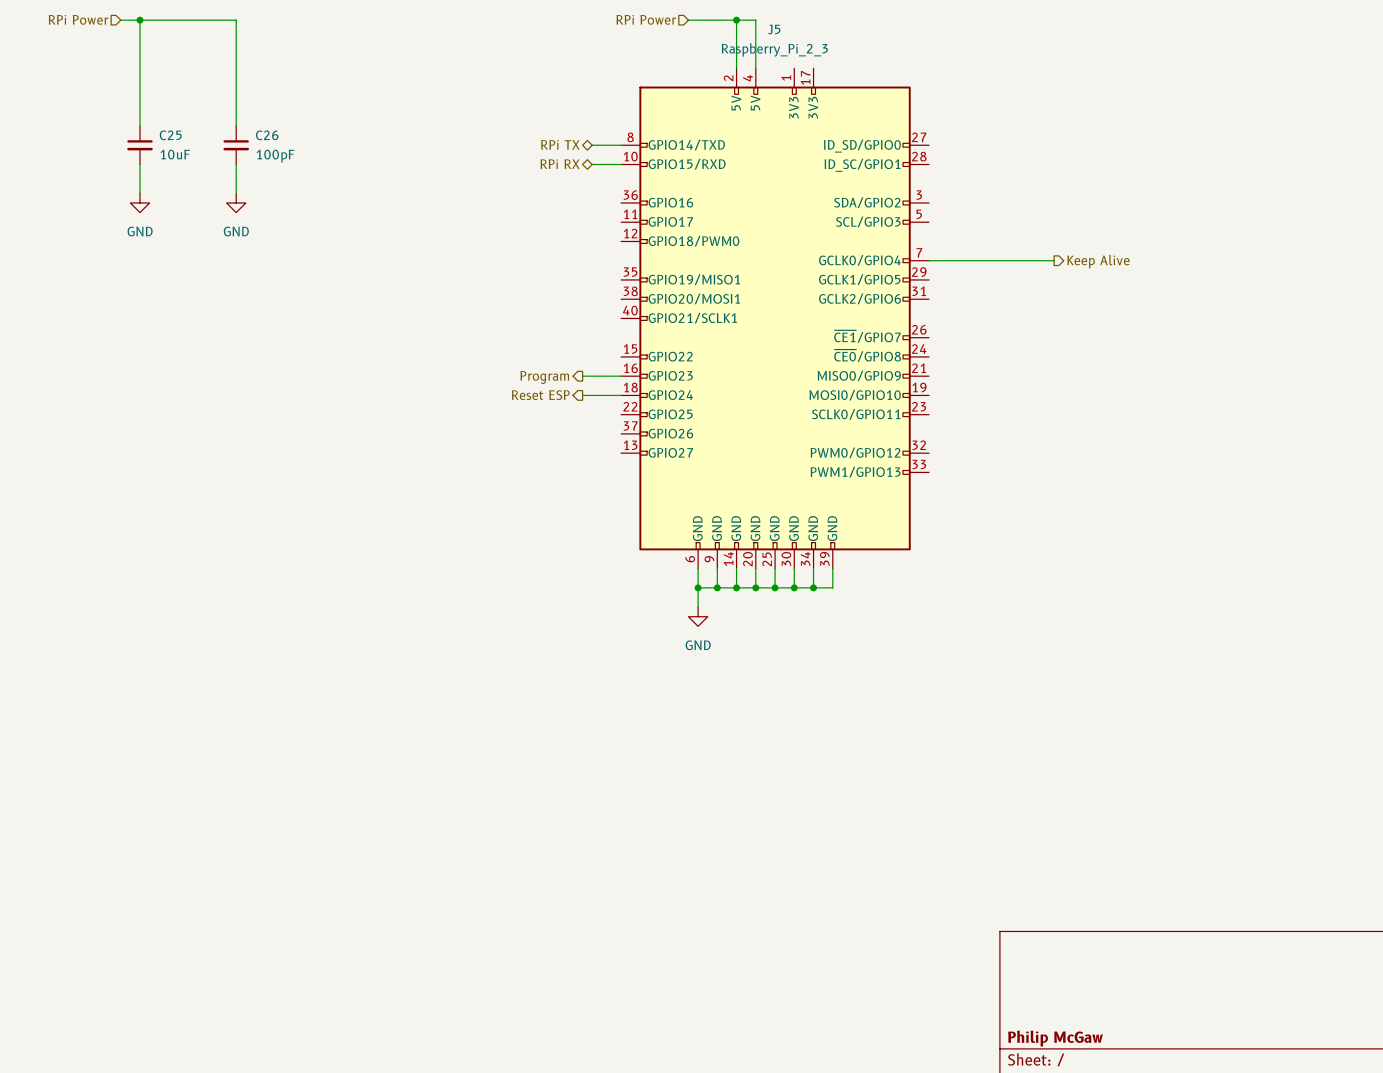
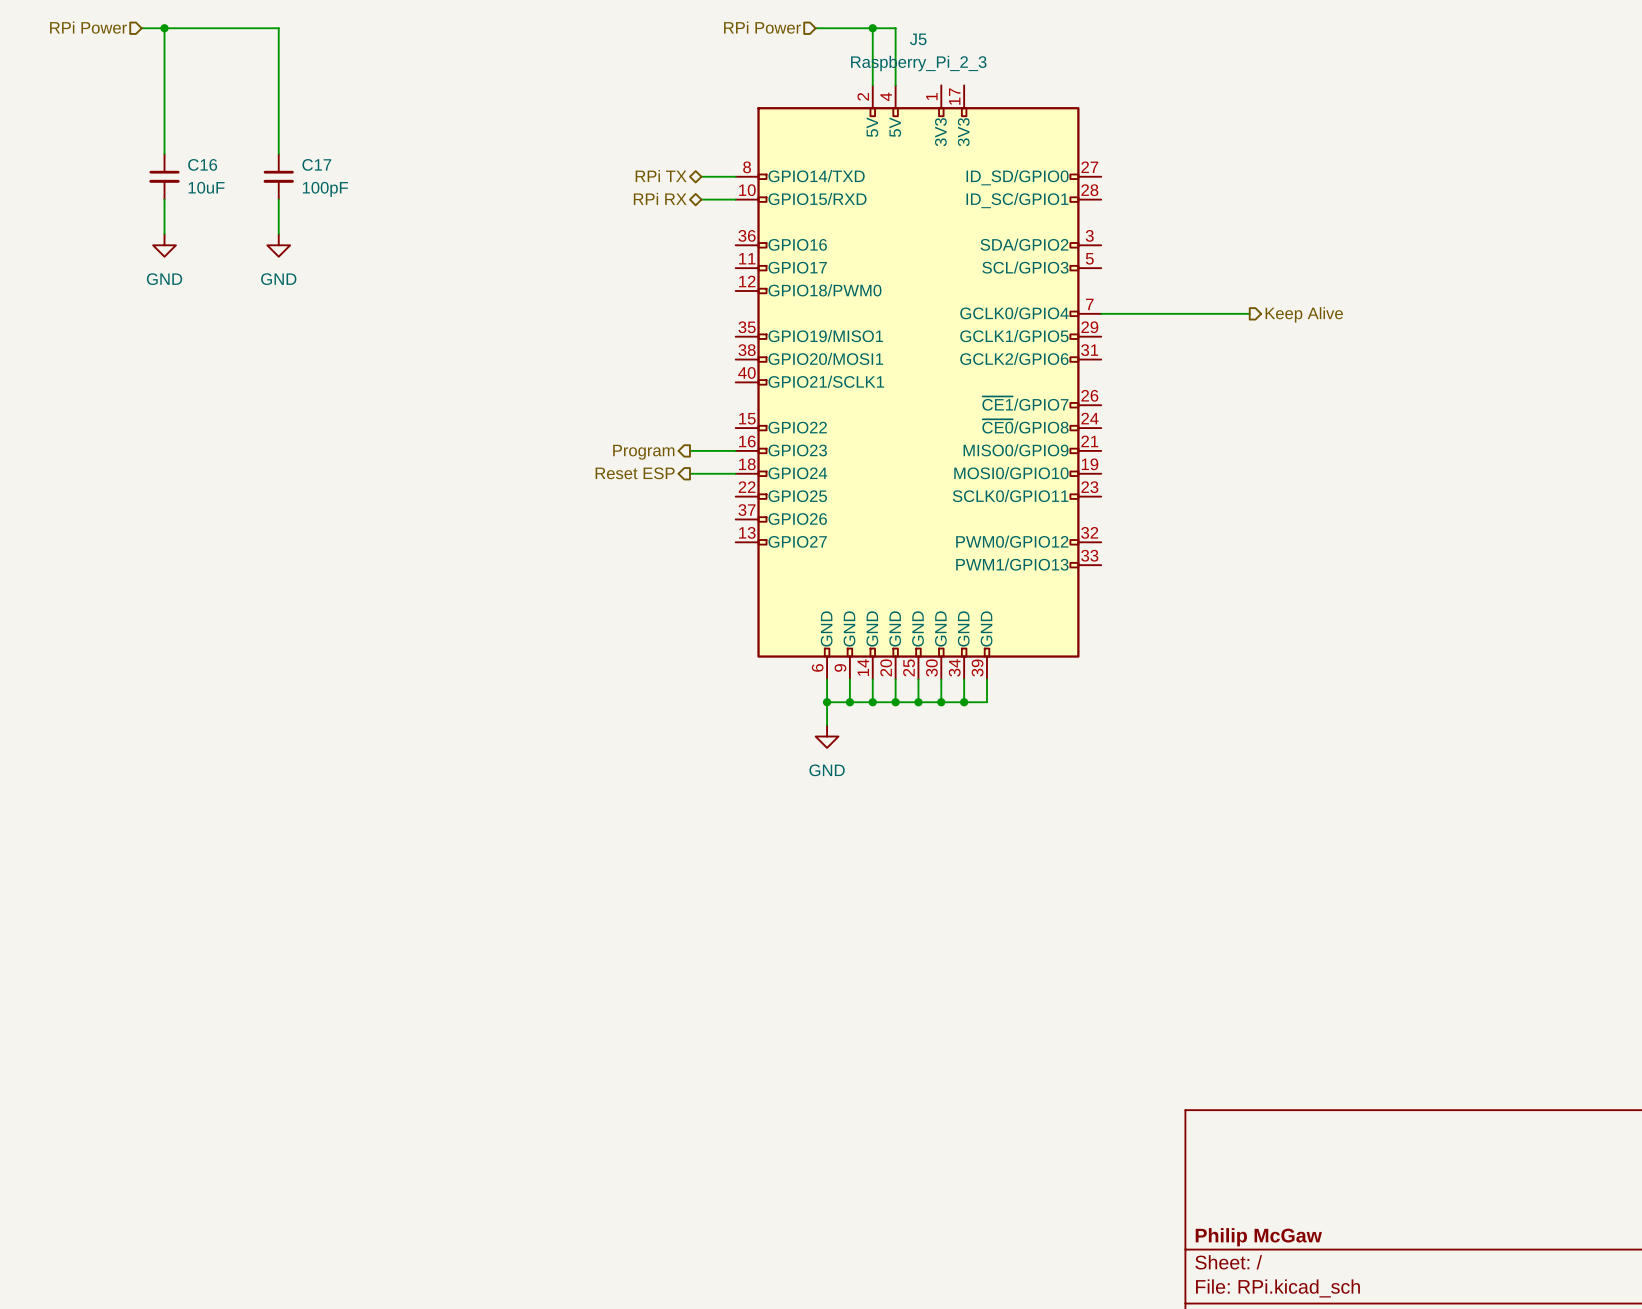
C25 name: C25 (170, 135) -> C16 (202, 164)
C26 name: C26 (267, 135) -> C17 (316, 164)

